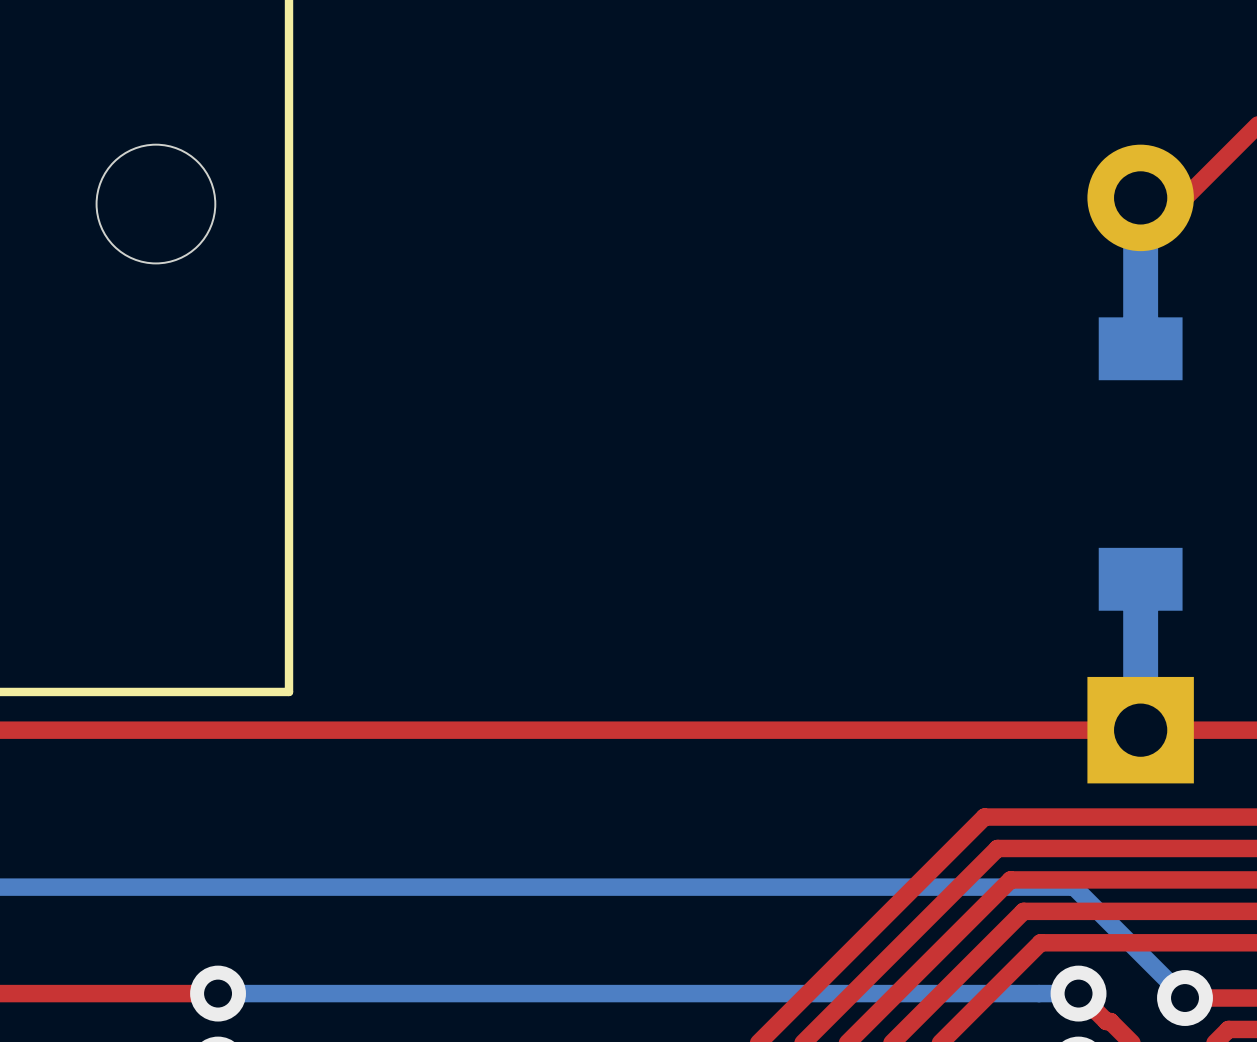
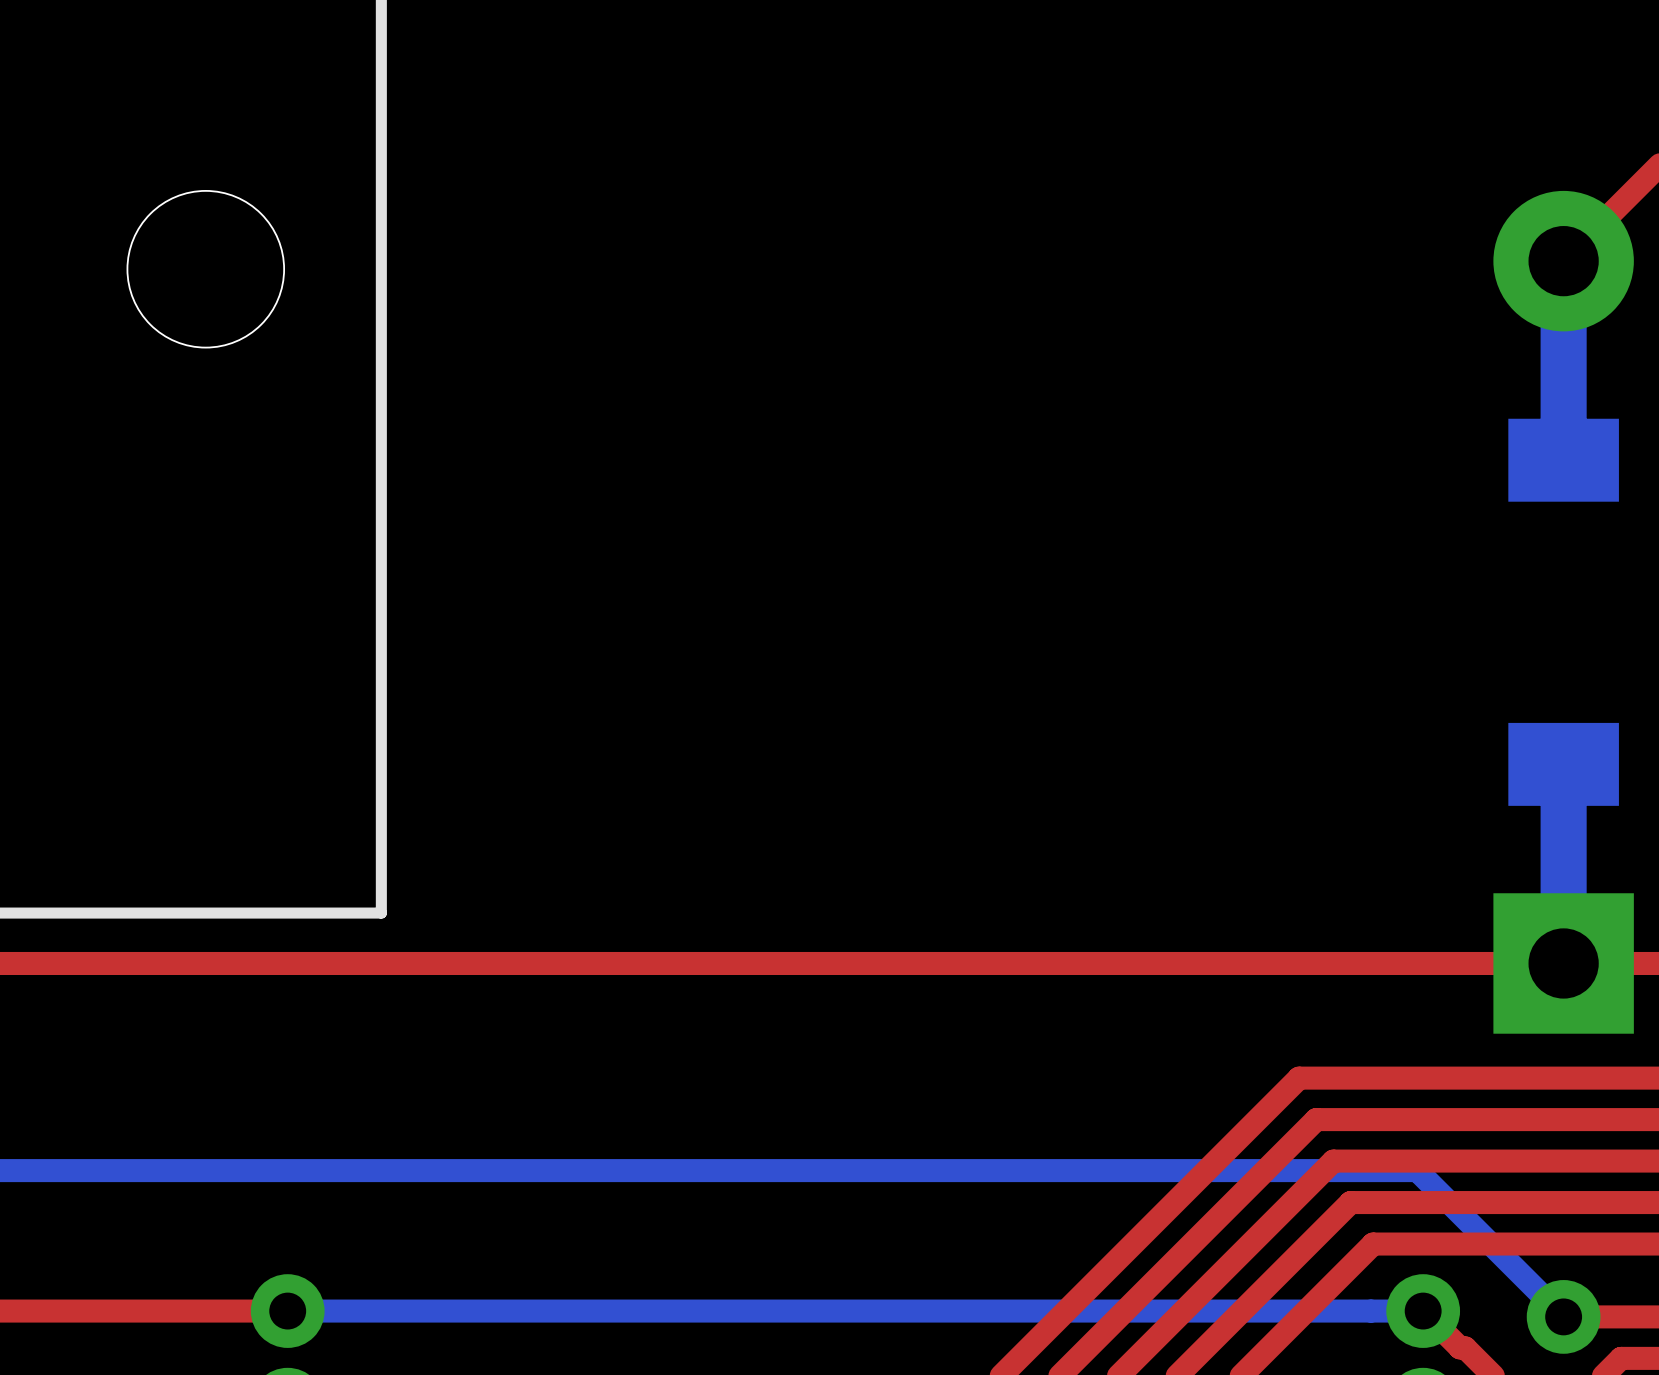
part position: (1140, 464) -> (1563, 612)

